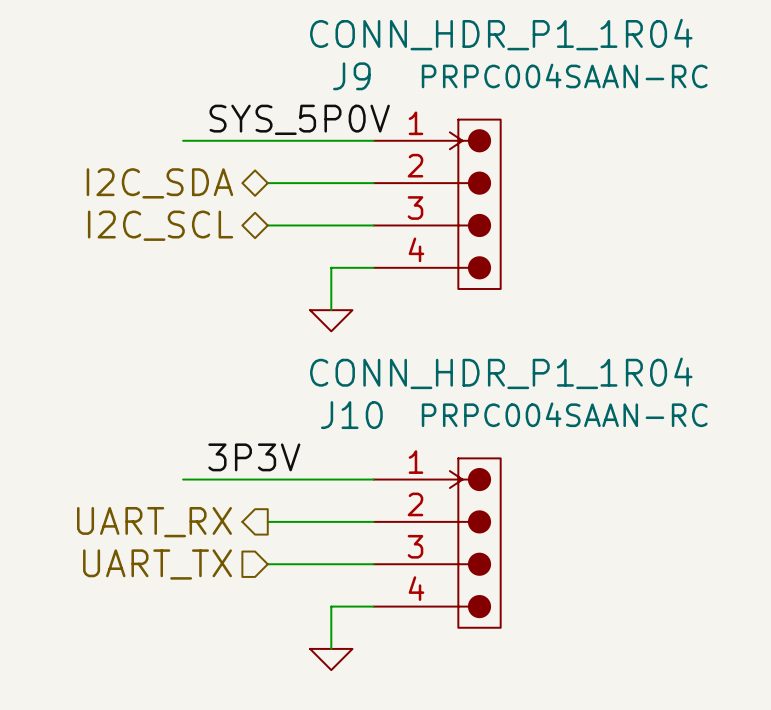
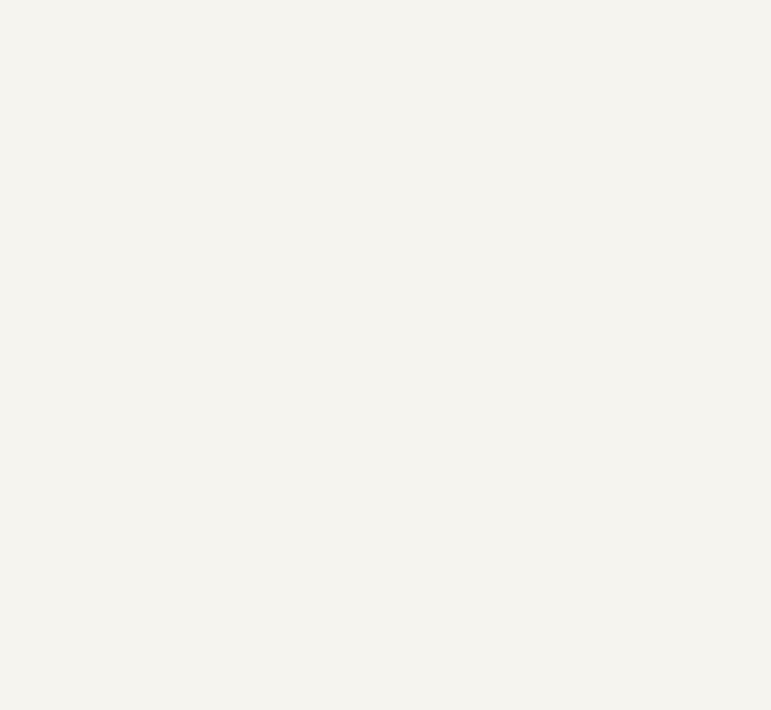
label: SYS_5P0V (299, 119) -> none
wire: (183, 140) (373, 140) -> none
hierarchical label: I2C_SDA (159, 183) -> none
wire: (267, 183) (373, 183) -> none
J9: (437, 204) -> none
hierarchical label: I2C_SCL (160, 225) -> none
wire: (267, 225) (373, 225) -> none
wire: (373, 267) (331, 267) (331, 310) -> none
power symbol: (331, 320) -> none
label: 3P3V (254, 457) -> none
wire: (183, 479) (373, 479) -> none
wire: (267, 521) (373, 521) -> none
hierarchical label: UART_RX (154, 522) -> none
J10: (437, 543) -> none
hierarchical label: UART_TX (157, 564) -> none
wire: (267, 564) (373, 564) -> none
wire: (373, 606) (331, 606) (331, 648) -> none
power symbol: (331, 659) -> none

